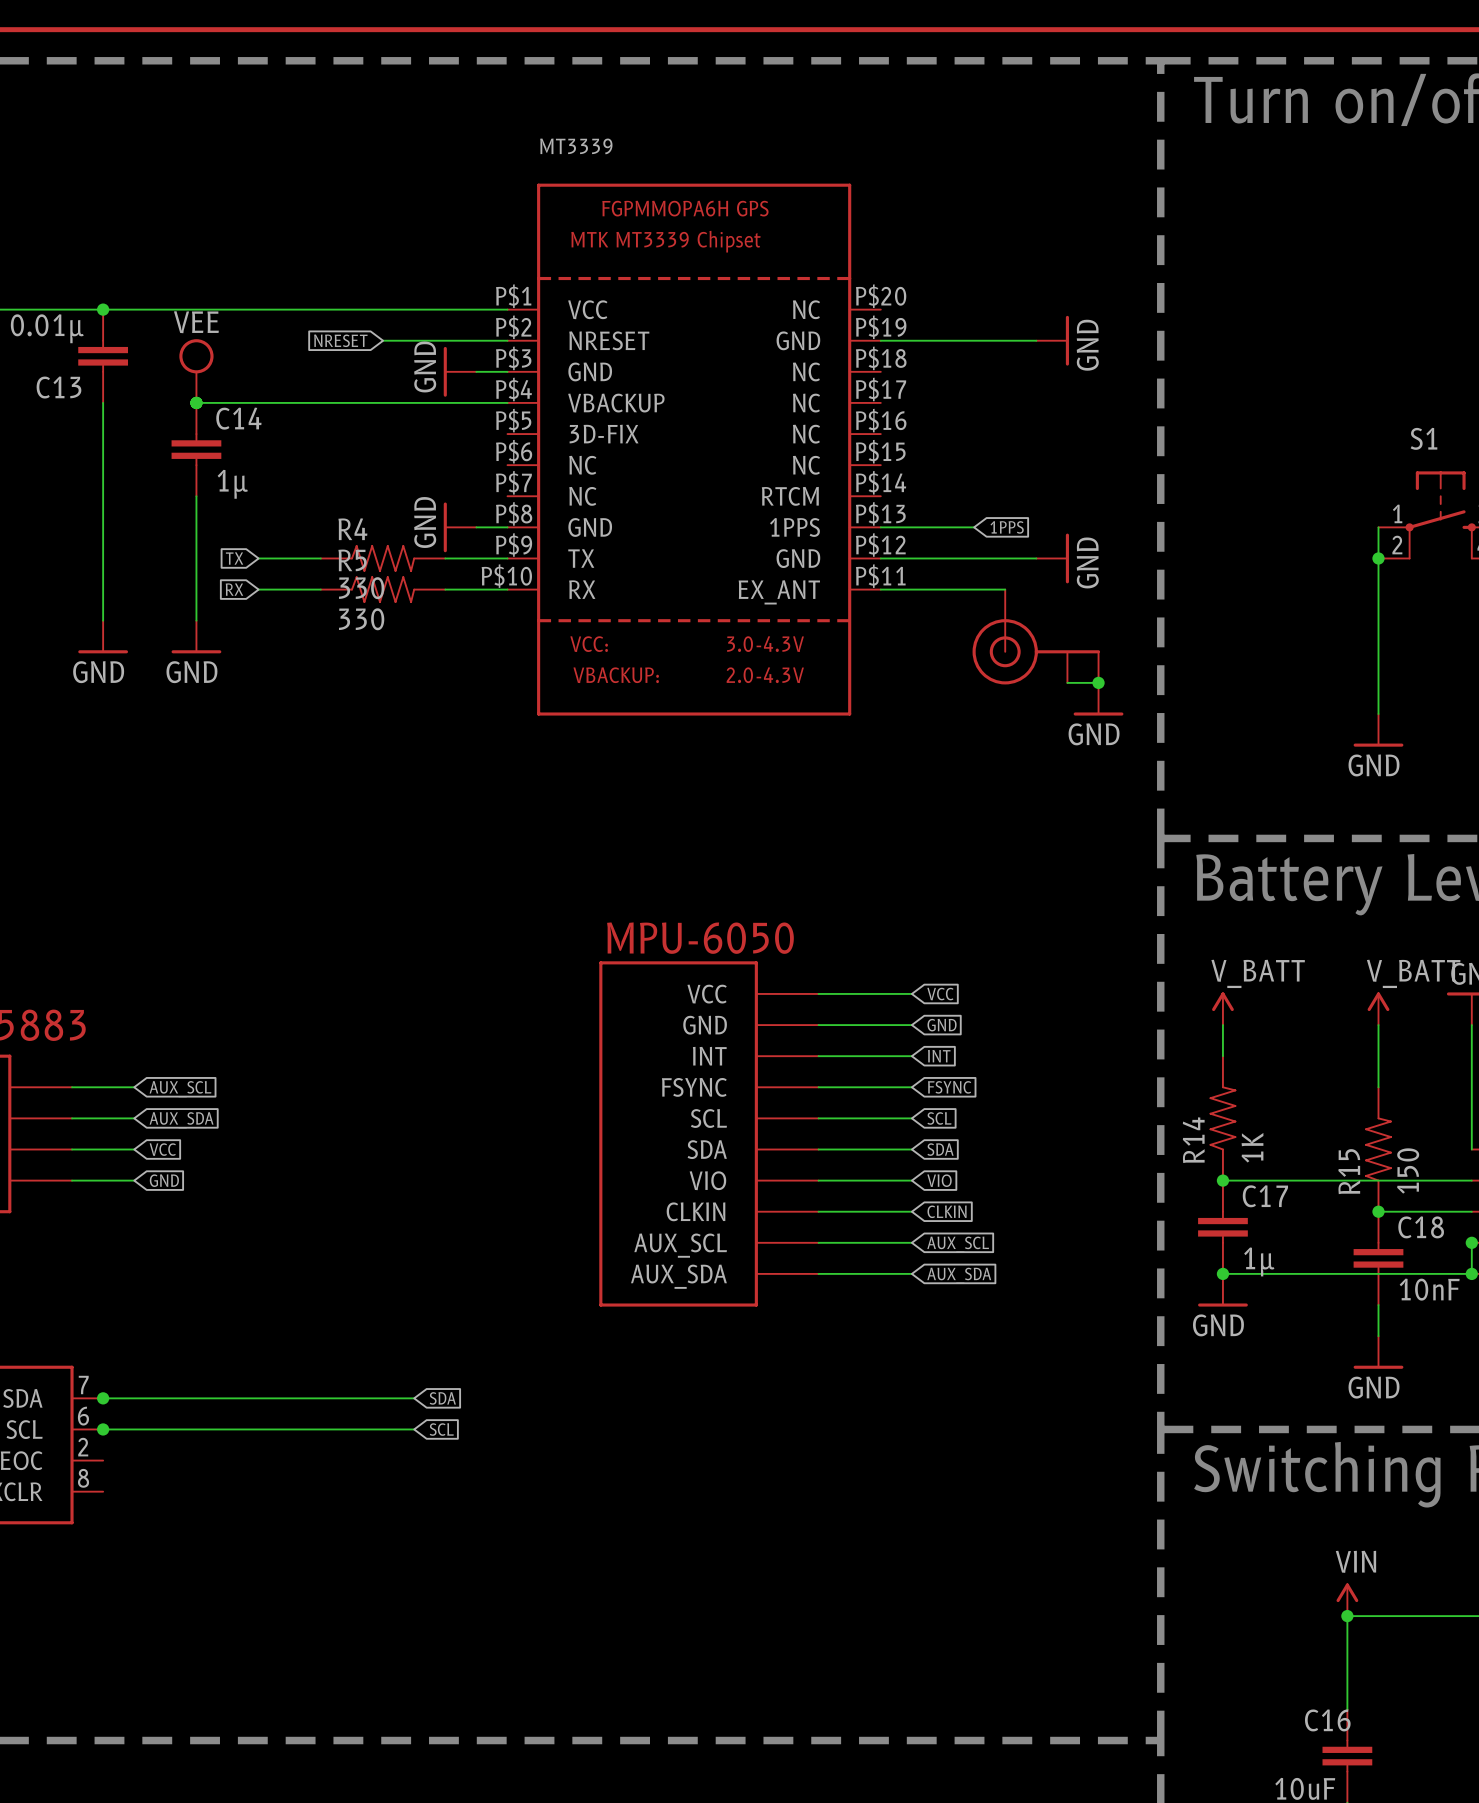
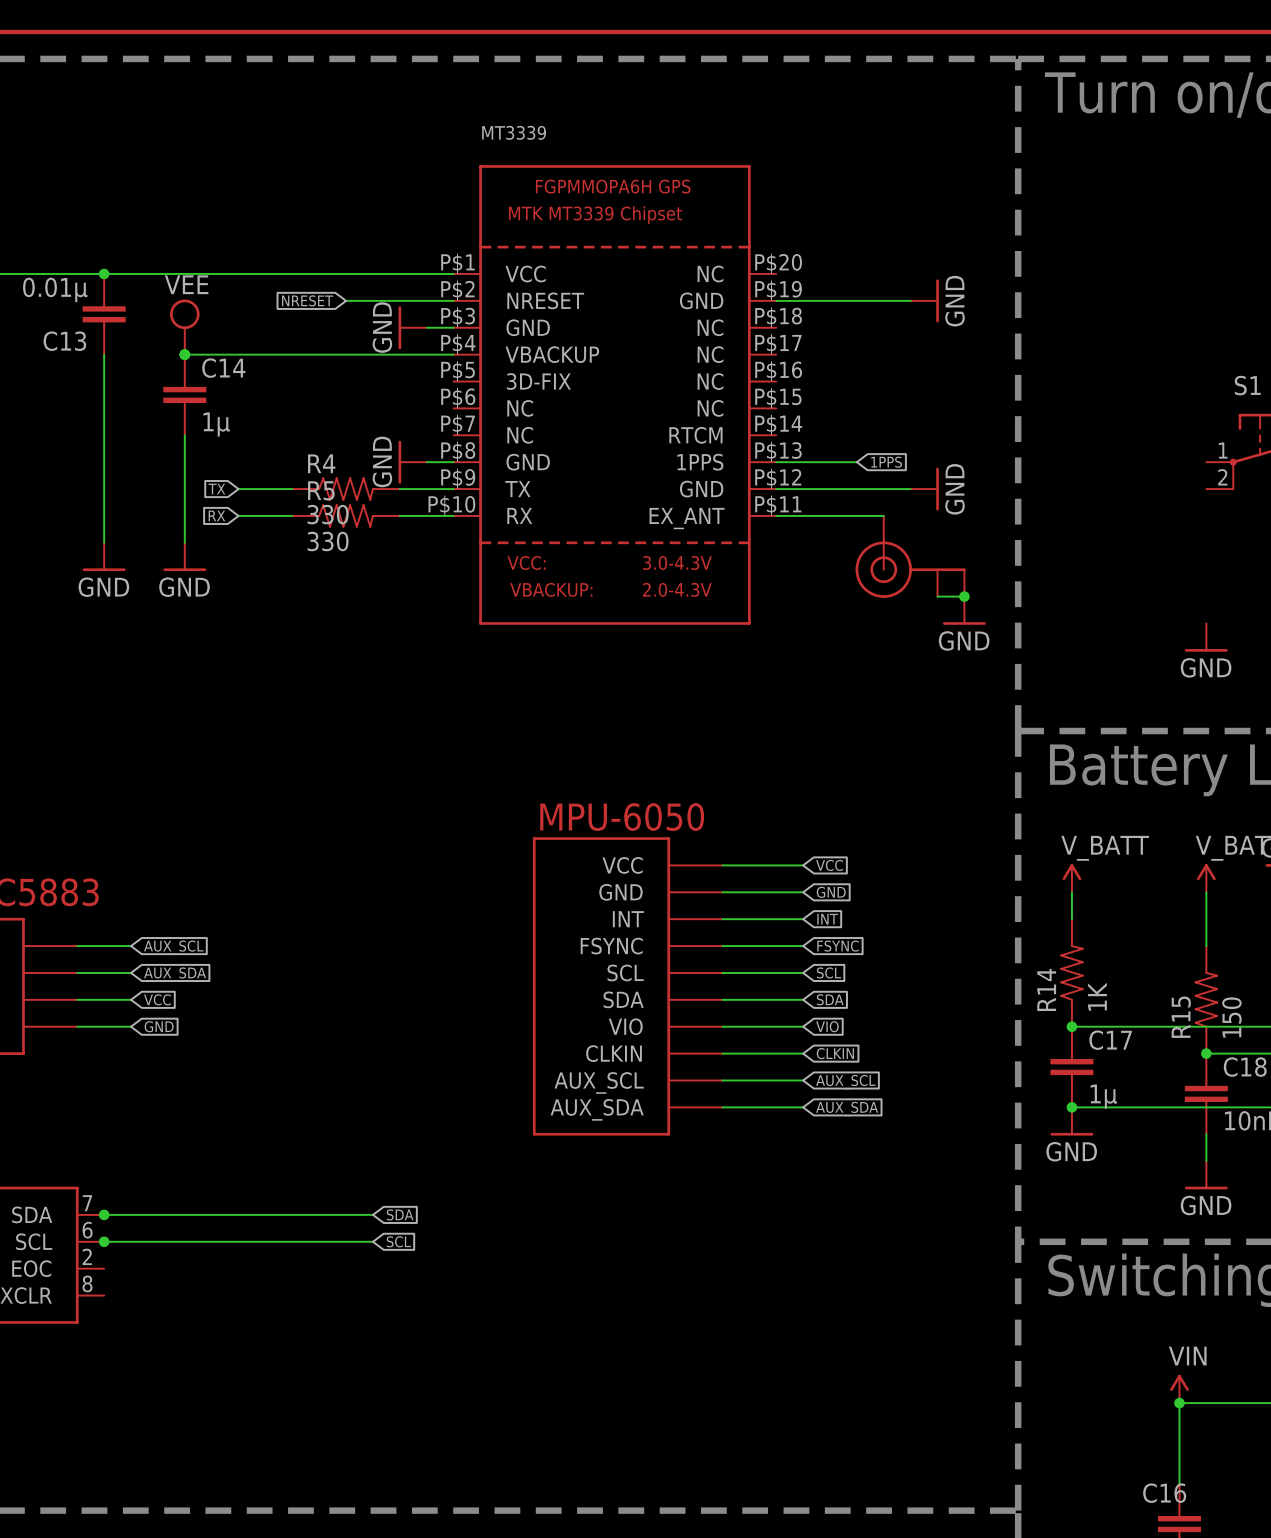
wire: (1378, 527) (1378, 714) -> none
junction: (1378, 558) -> none

